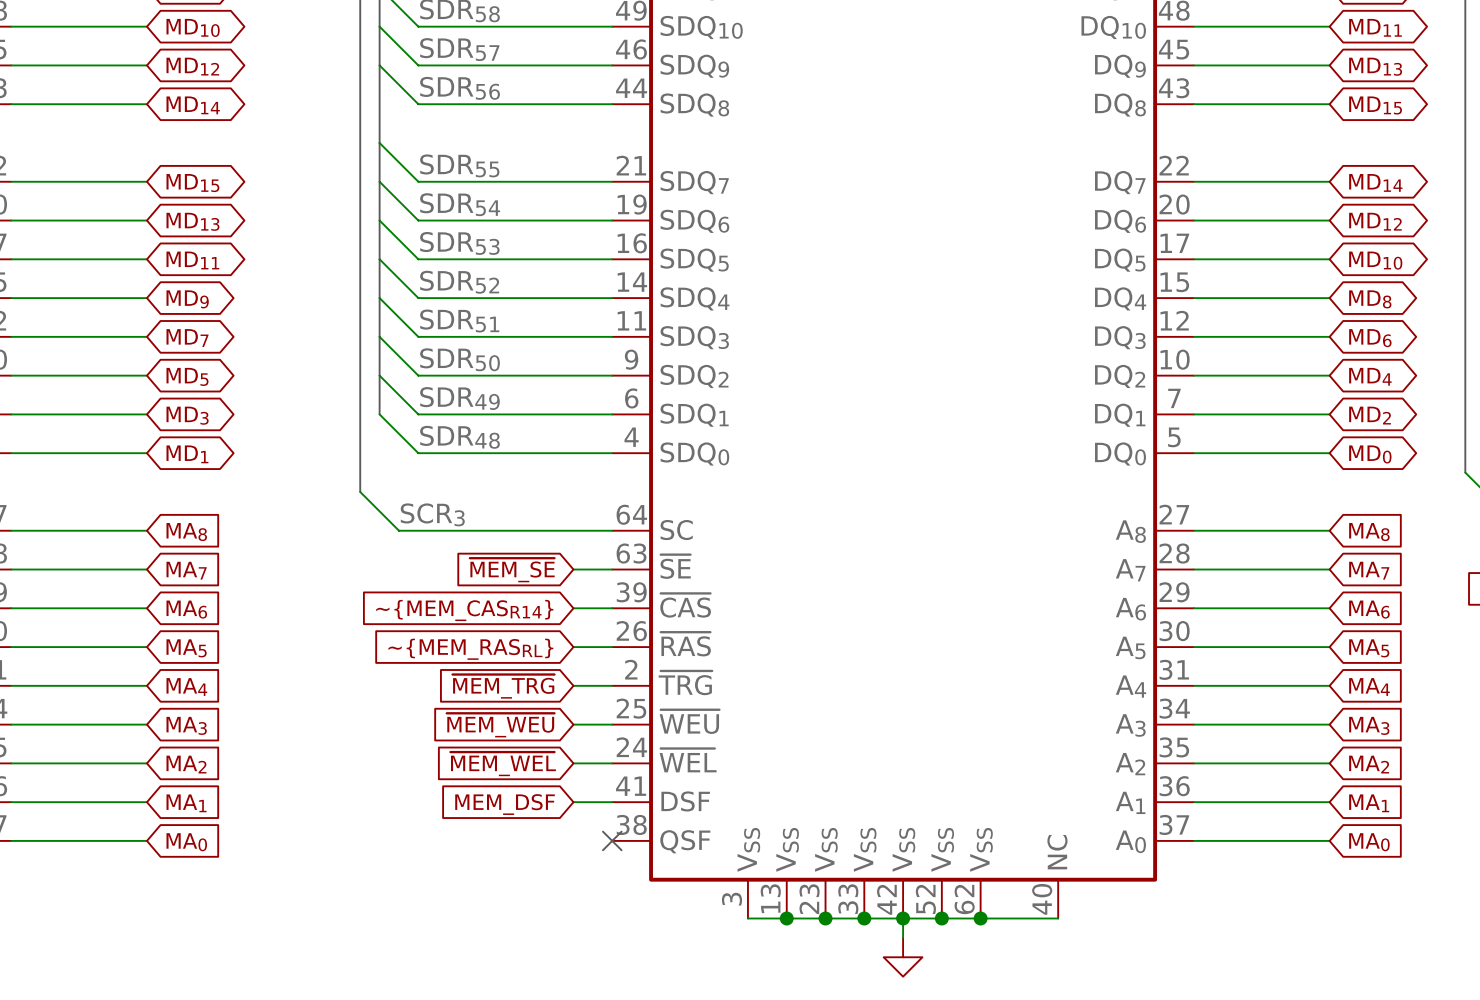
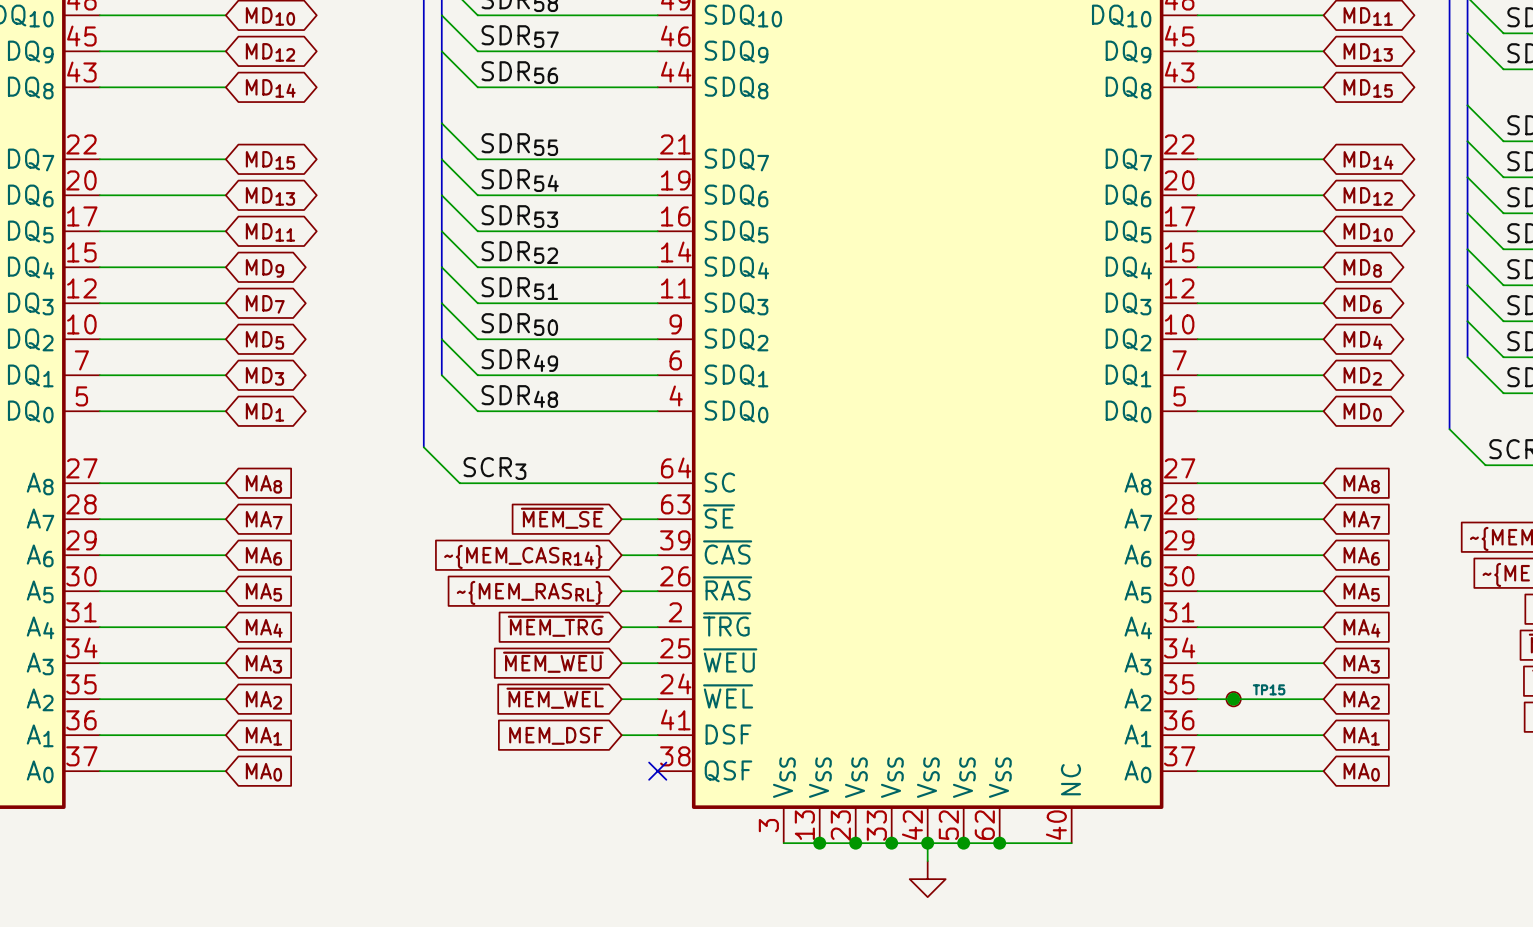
junction: none -> (1233, 699)
TP15: none -> (1233, 699)

